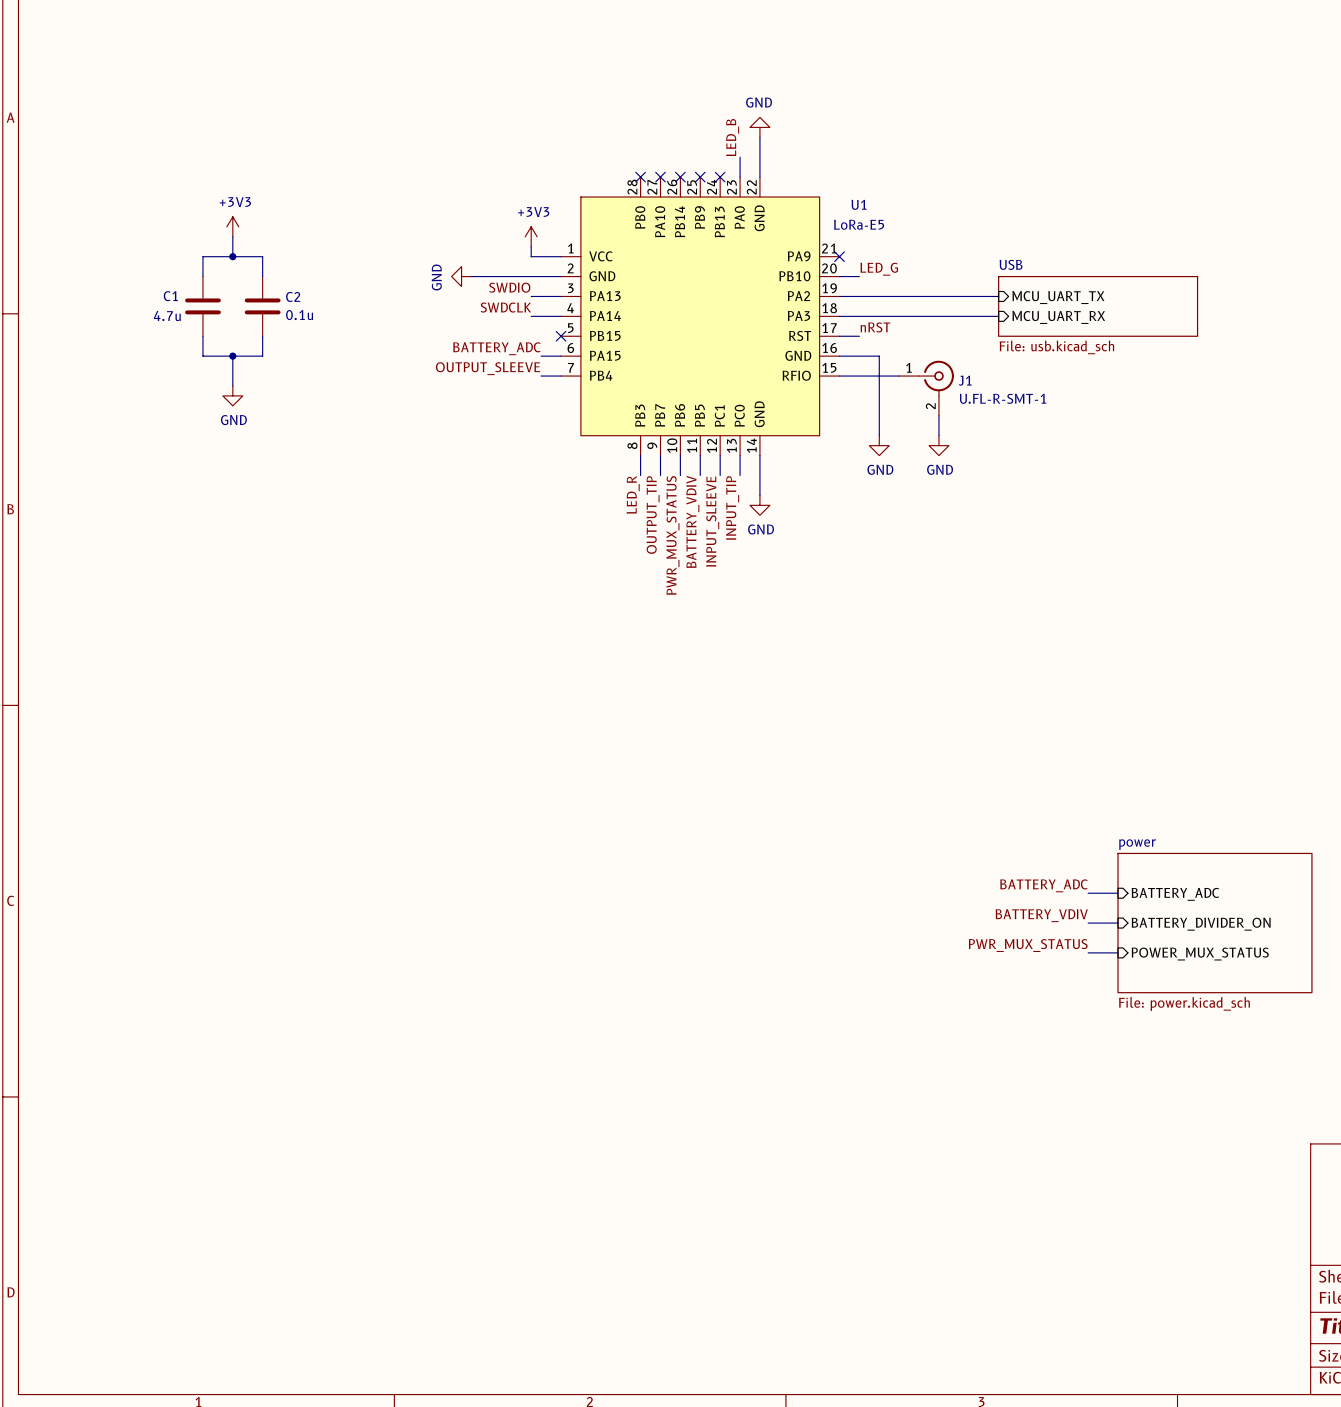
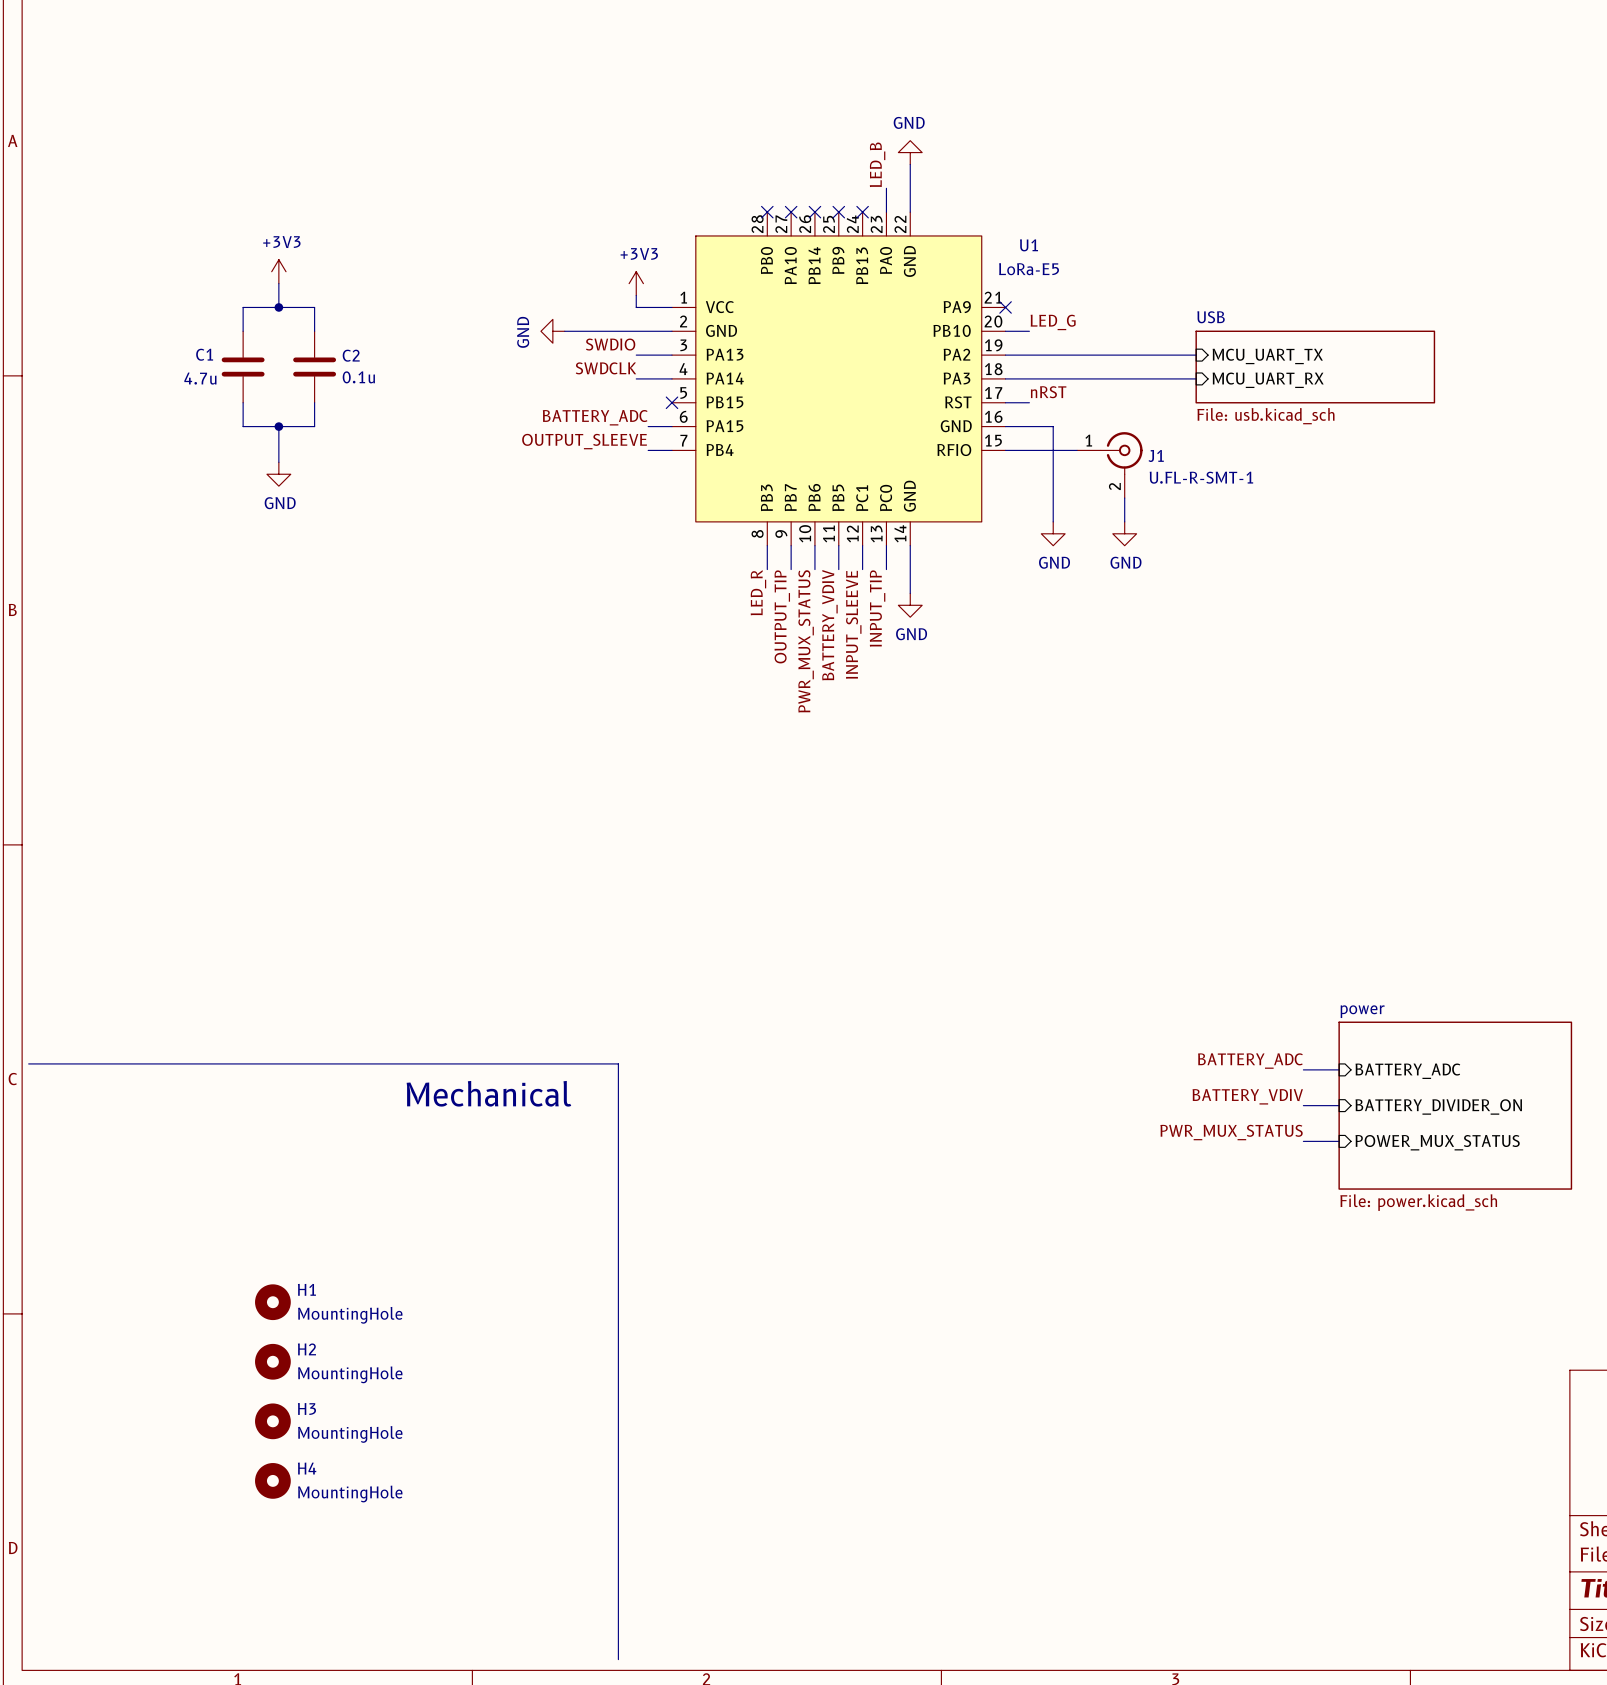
line: none -> (28, 1063) (618, 1063) (618, 1659)
text: none -> Mechanical (488, 1093)
H1: none -> MountingHole (272, 1302)
H2: none -> MountingHole (272, 1361)
H3: none -> MountingHole (272, 1421)
H4: none -> MountingHole (272, 1480)

